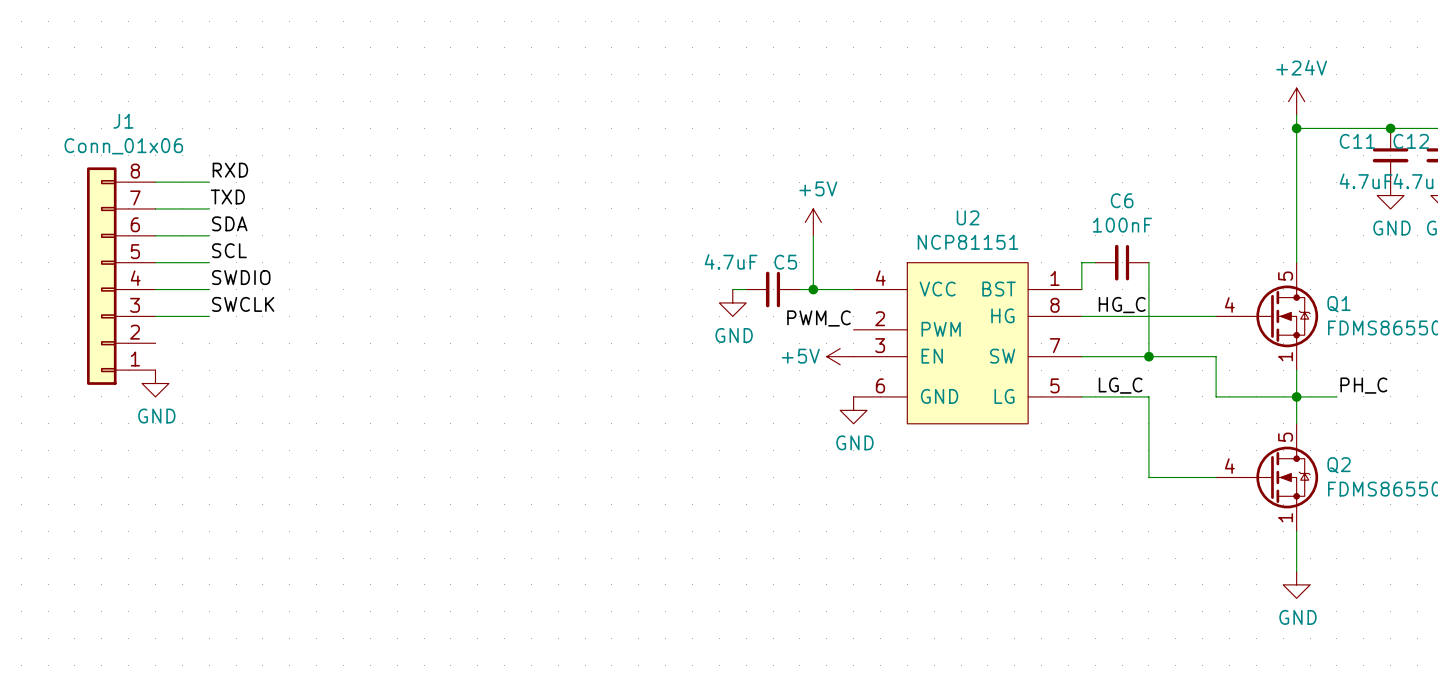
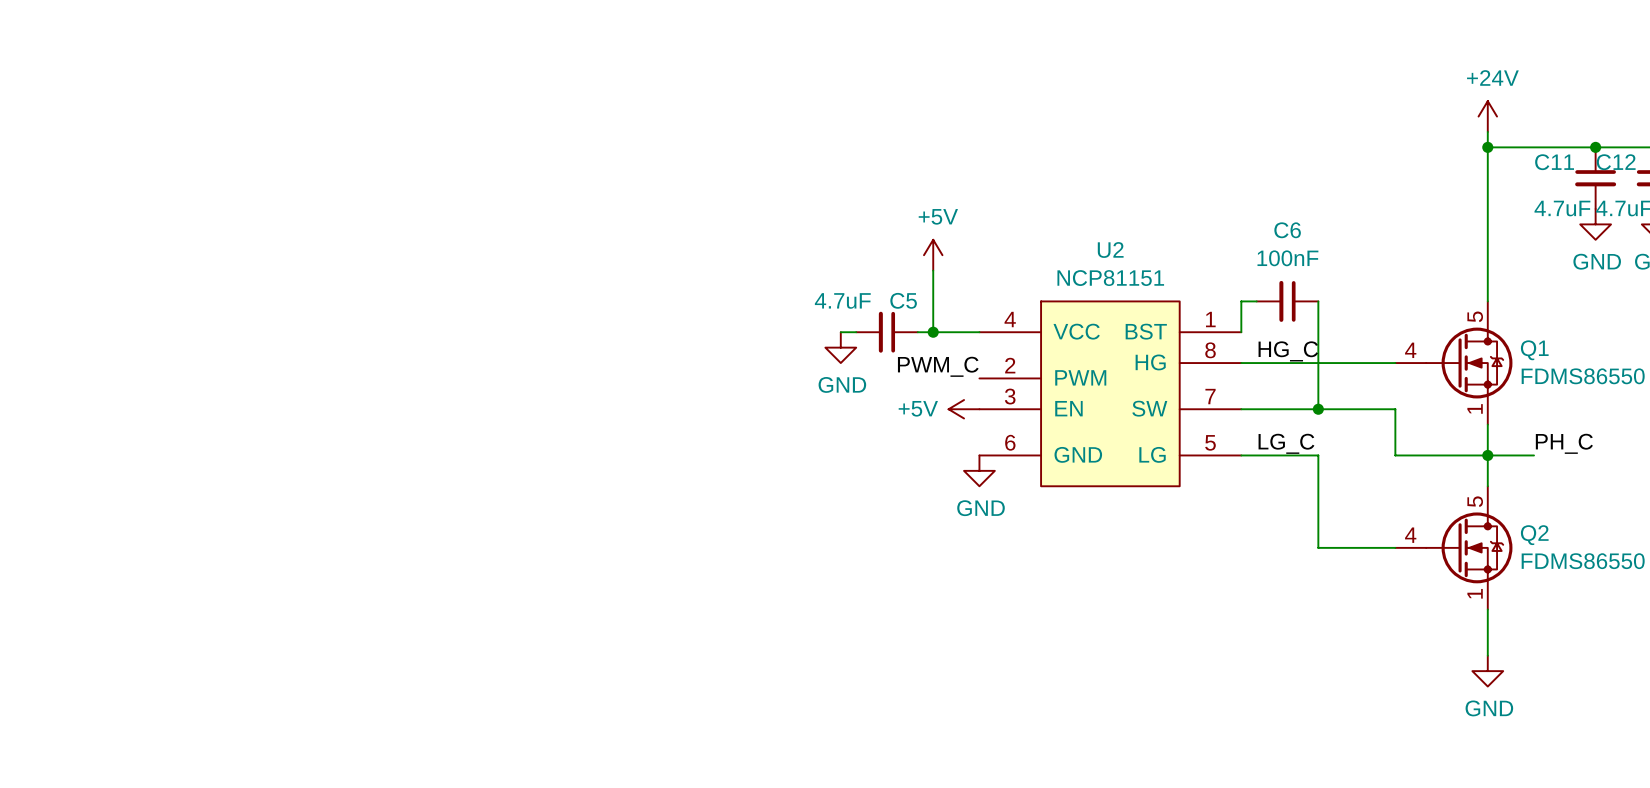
label: RXD (230, 170) -> none
wire: (155, 182) (209, 182) -> none
label: TXD (227, 197) -> none
wire: (155, 208) (209, 208) -> none
label: SDA (229, 223) -> none
wire: (155, 235) (209, 235) -> none
label: SCL (229, 250) -> none
wire: (155, 262) (209, 262) -> none
J1: Conn_01x06 (121, 276) -> none
label: SWDIO (241, 277) -> none
wire: (155, 289) (209, 289) -> none
label: SWCLK (243, 304) -> none
wire: (155, 316) (209, 316) -> none
power symbol: GND (155, 383) -> none

